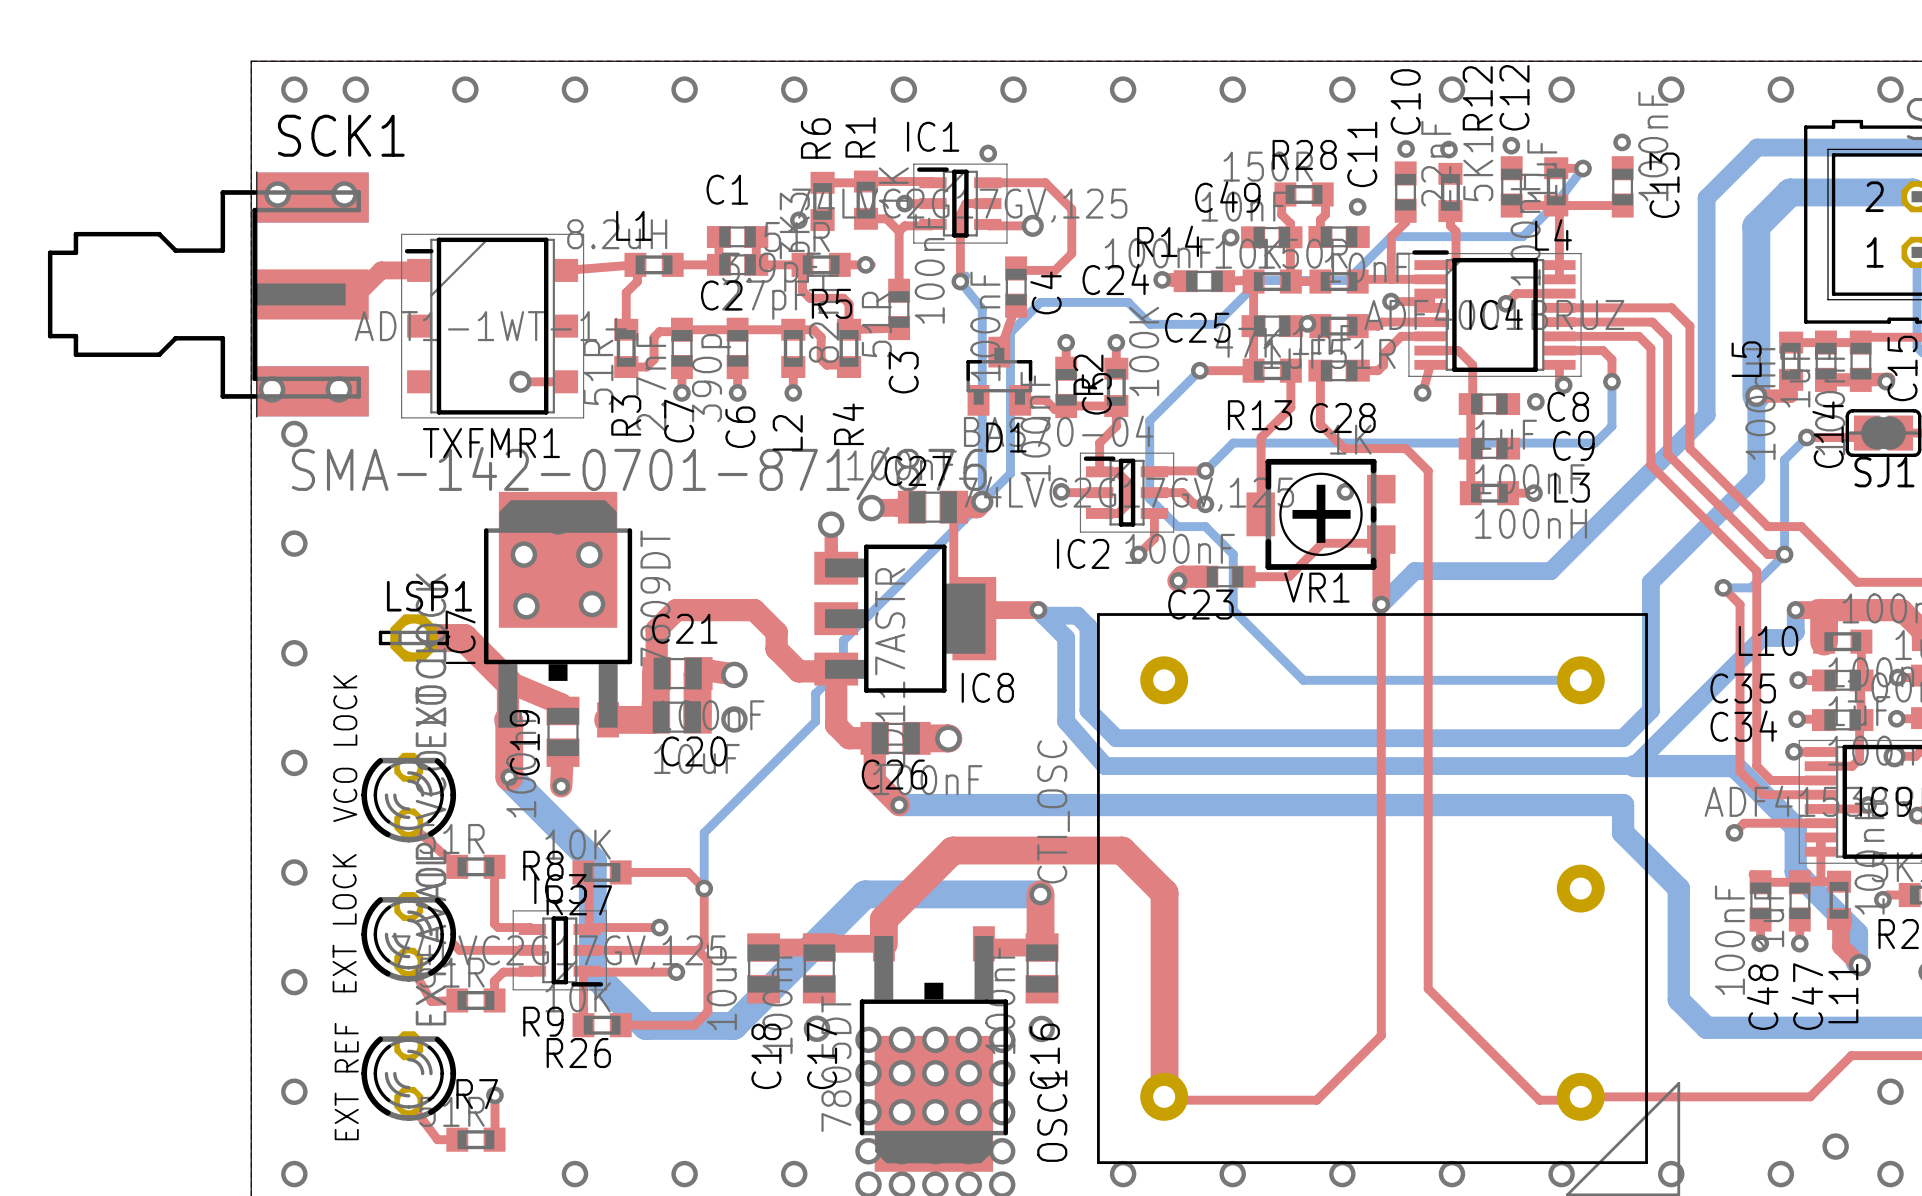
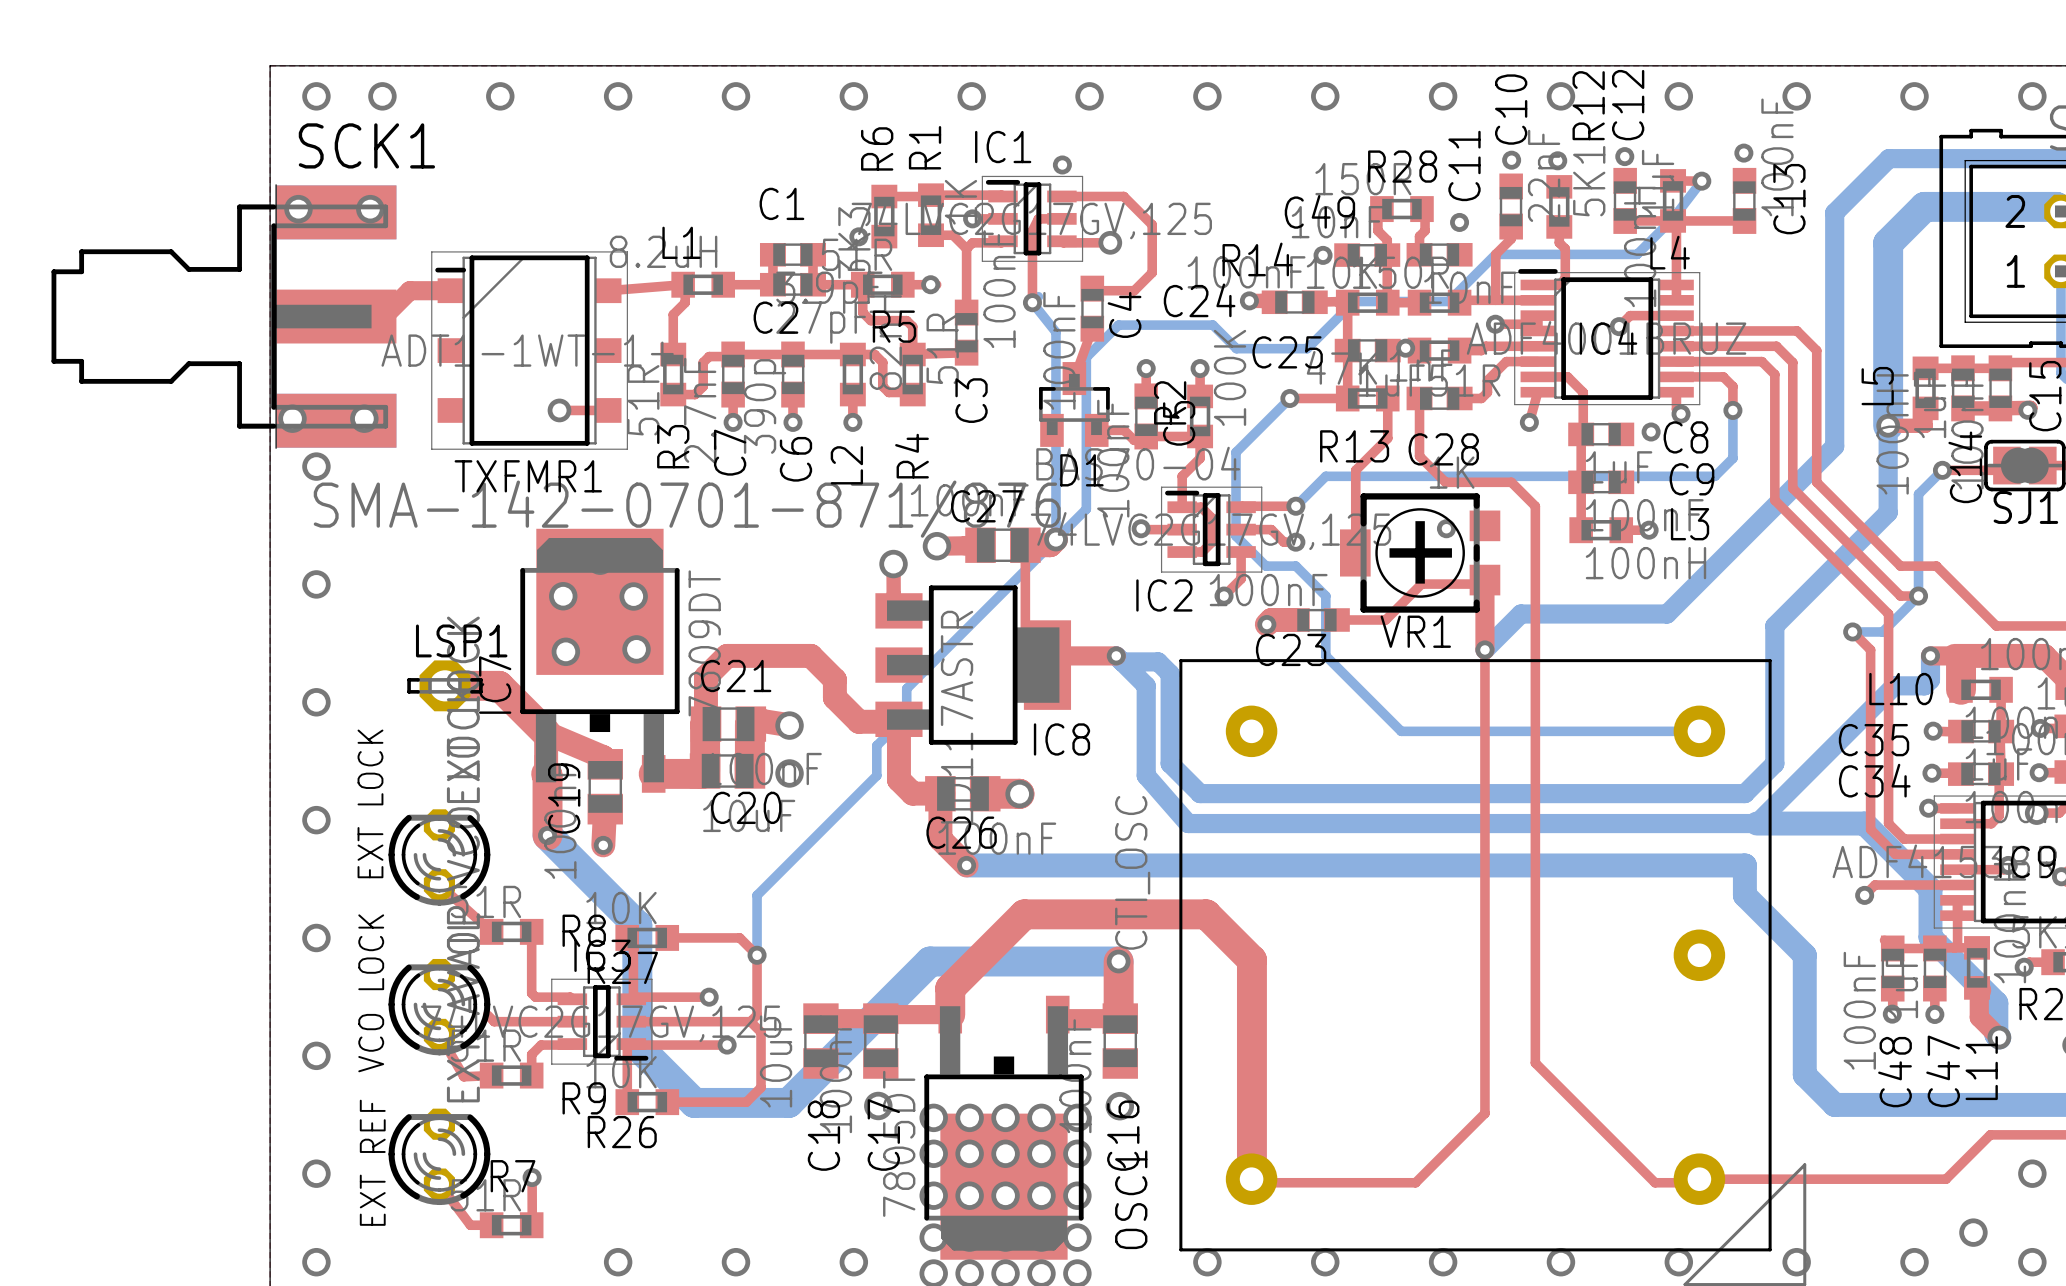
text: VCO LOCK (345, 748) -> EXT LOCK (370, 803)
text: EXT LOCK (344, 923) -> VCO LOCK (371, 993)

